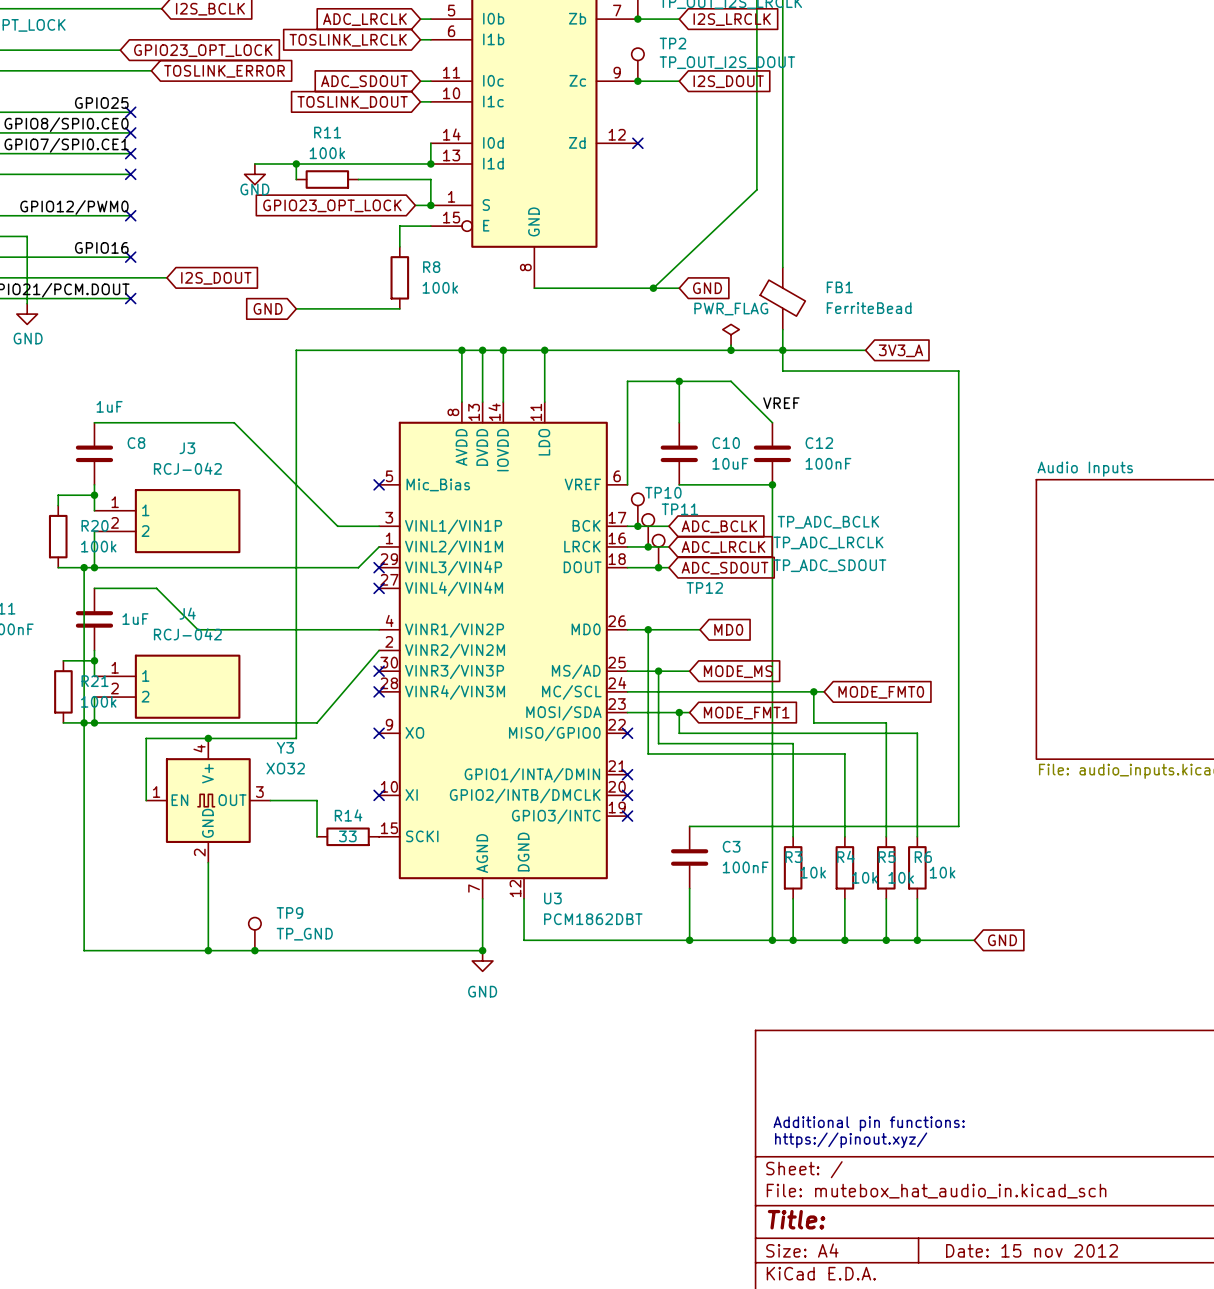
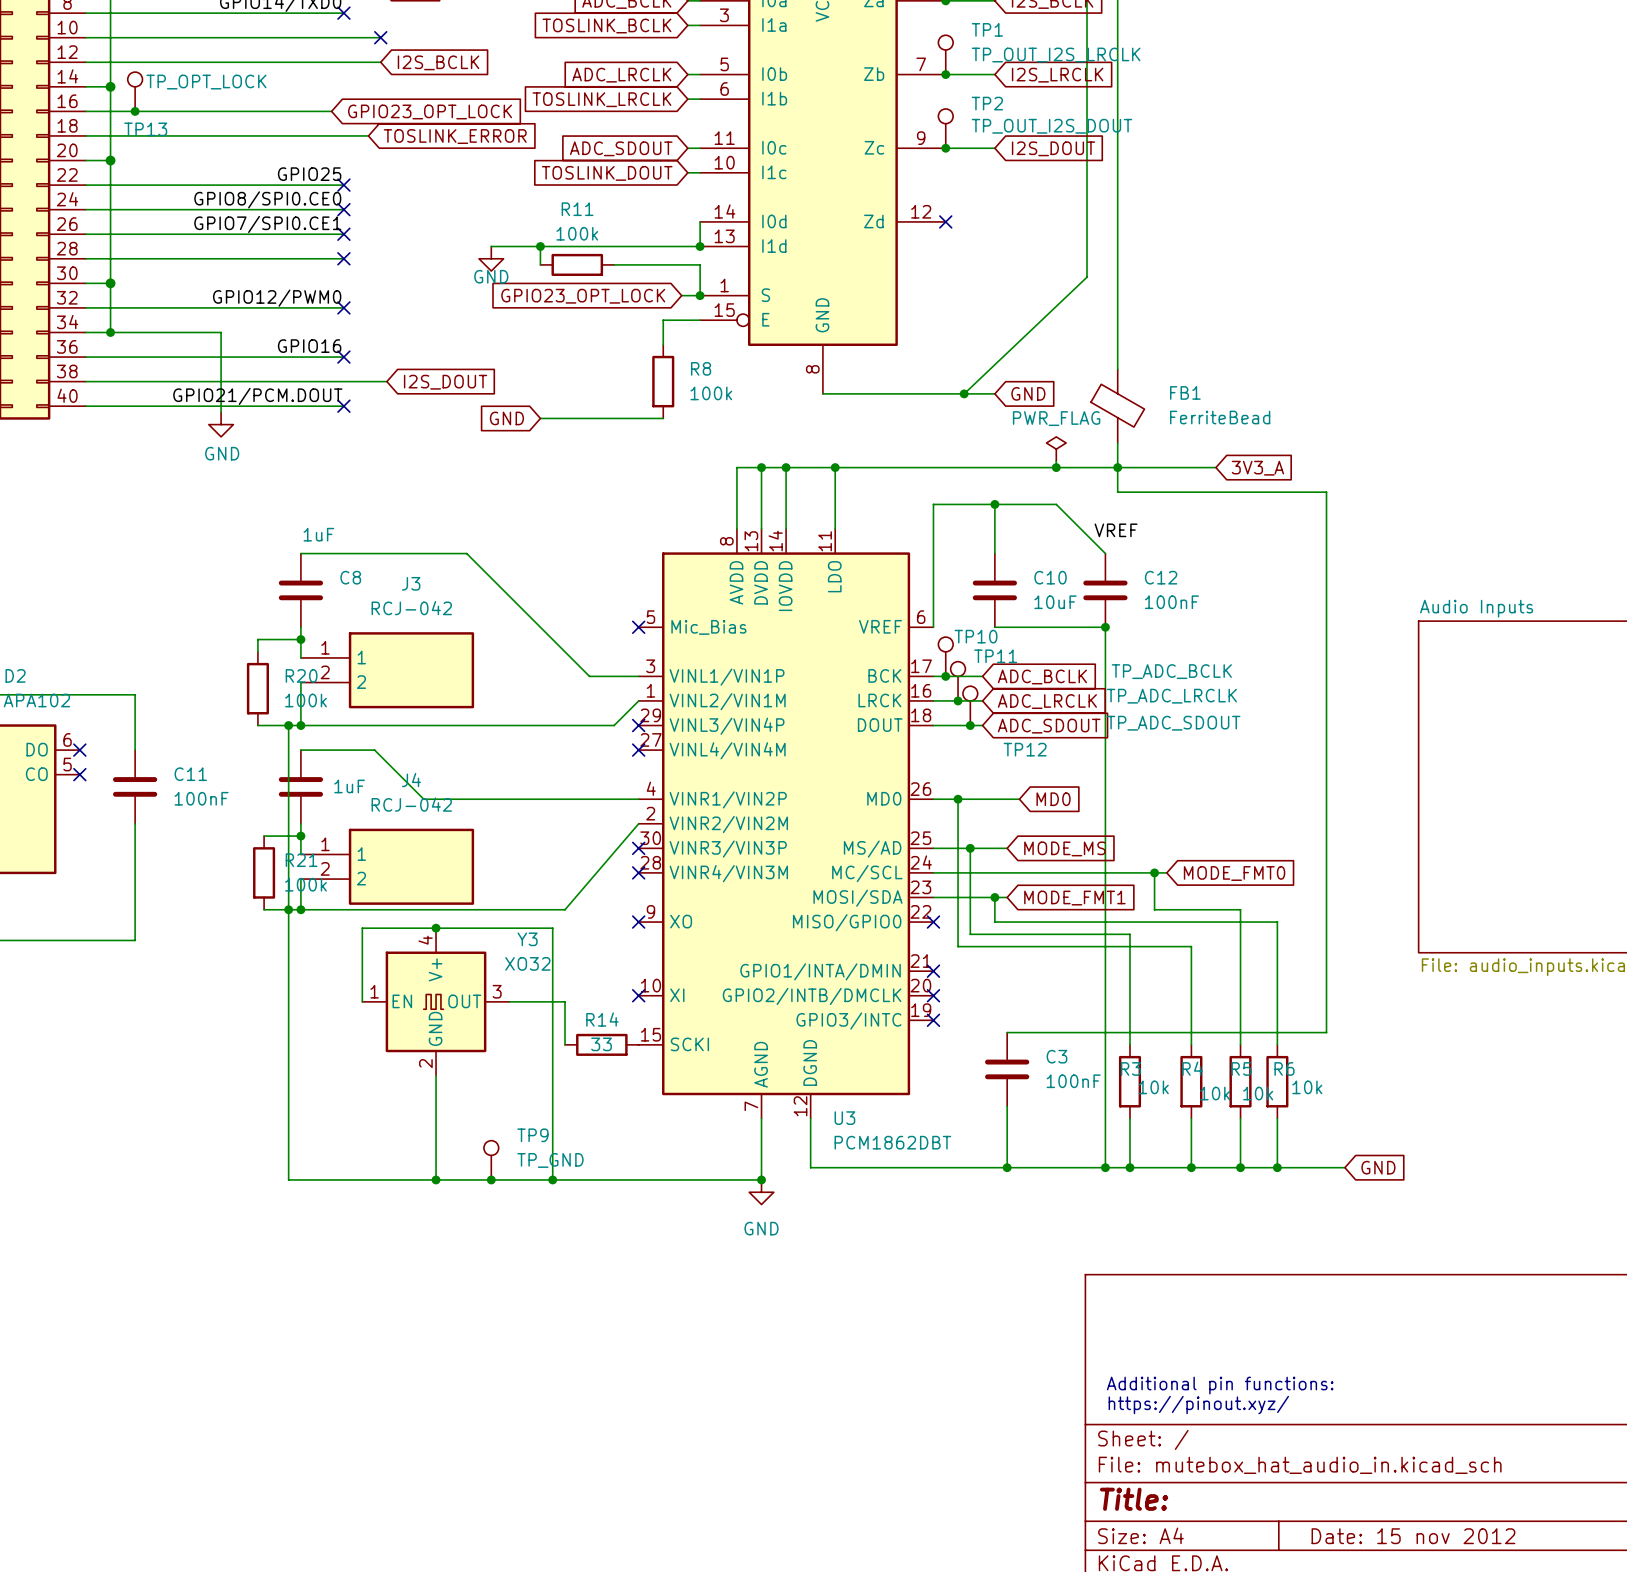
wire: (461, 350) (296, 350) (296, 738) -> (552, 1179) (552, 928) (540, 928)
junction: (461, 350) -> none
junction: none -> (552, 1179)

